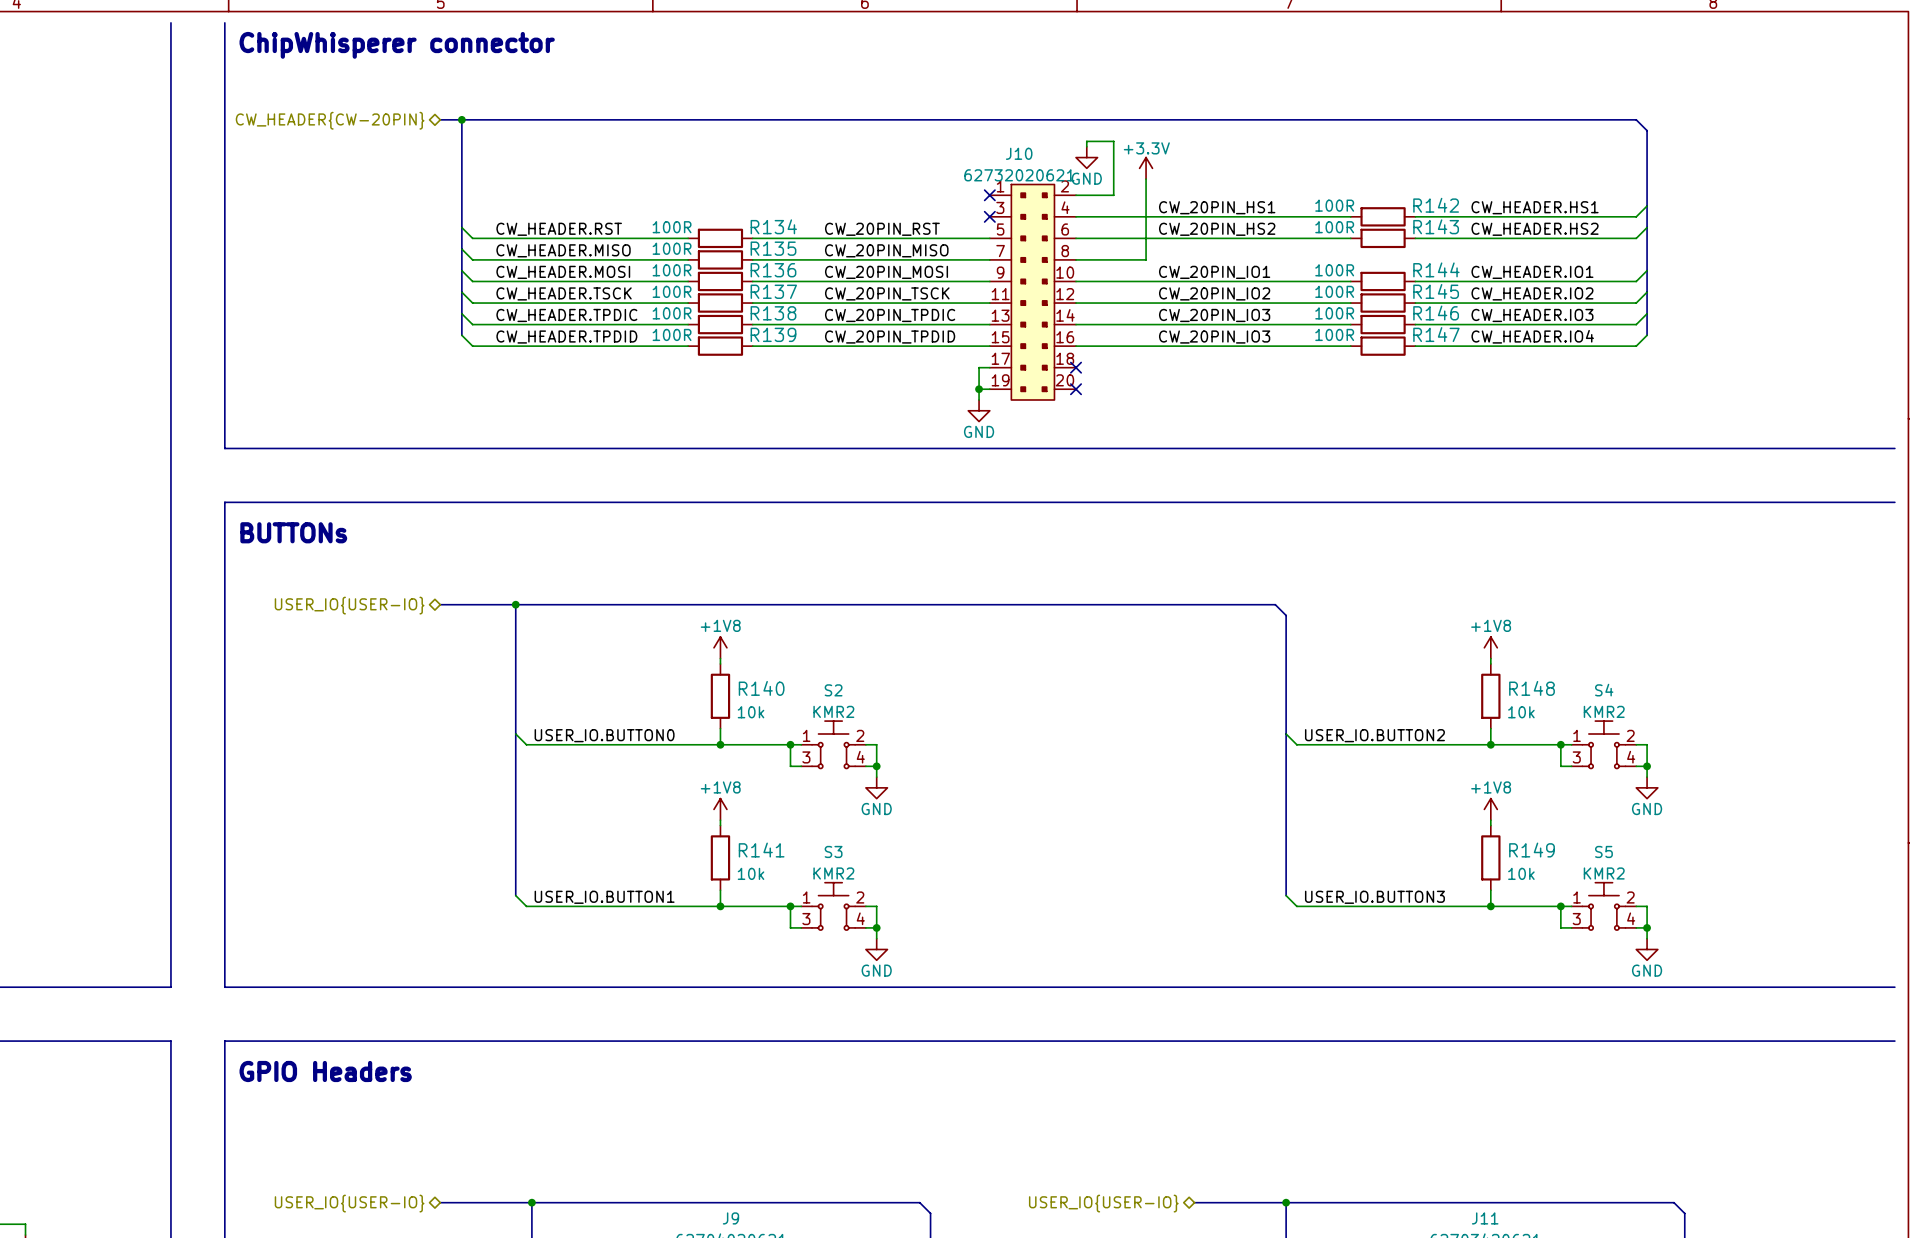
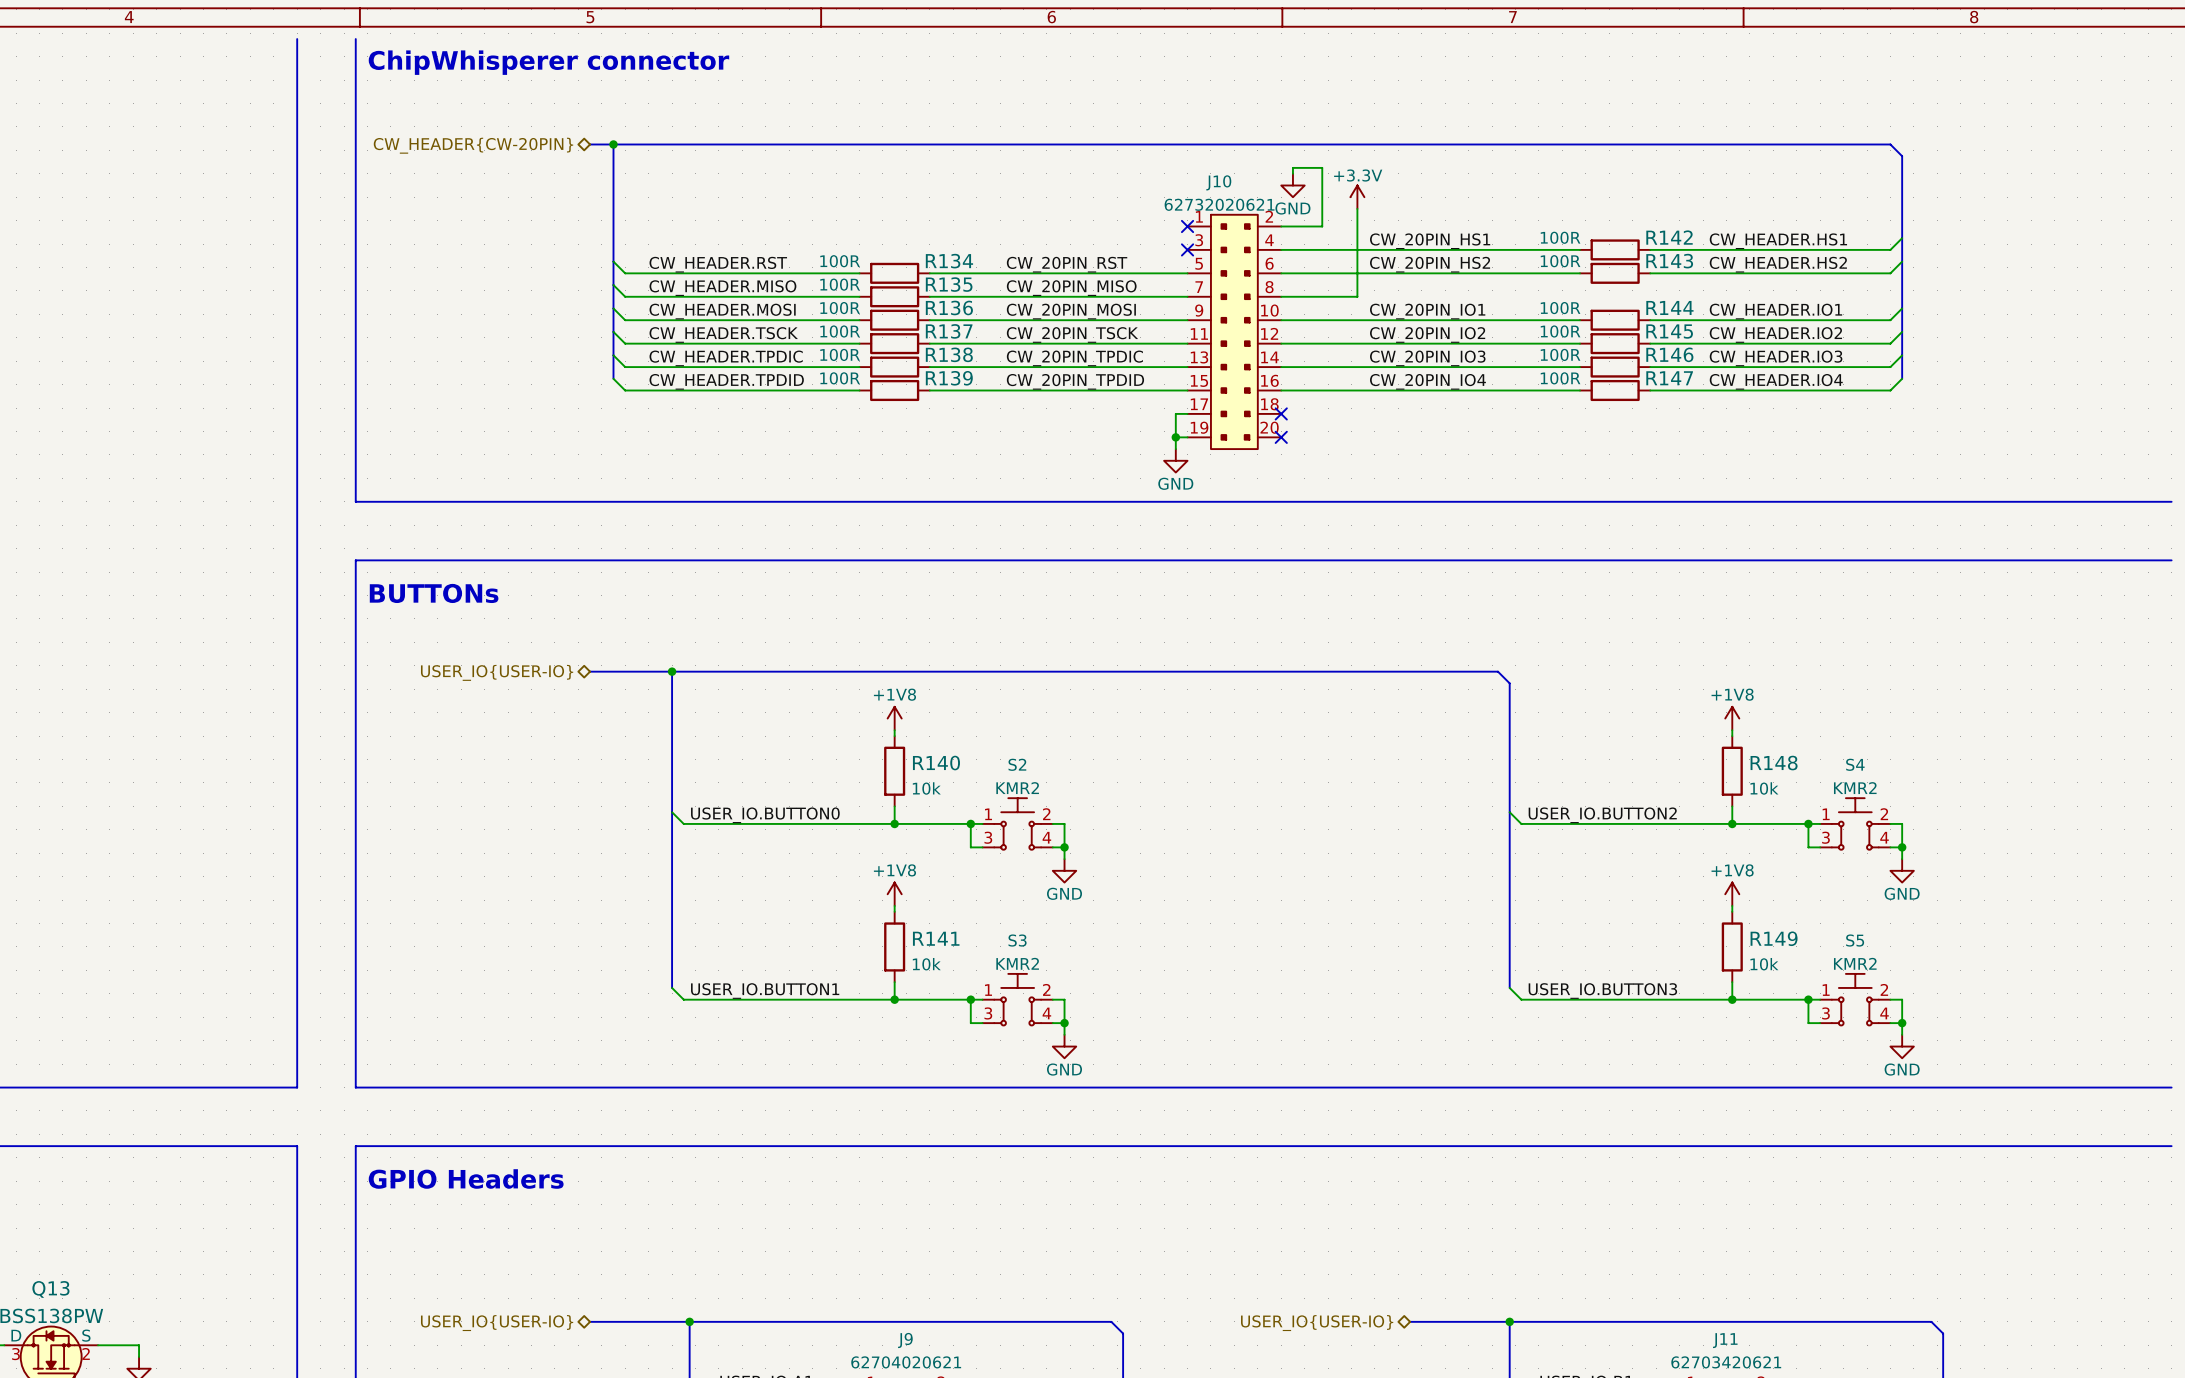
label: CW_20PIN_IO3 (1214, 337) -> CW_20PIN_IO4 (1427, 381)

